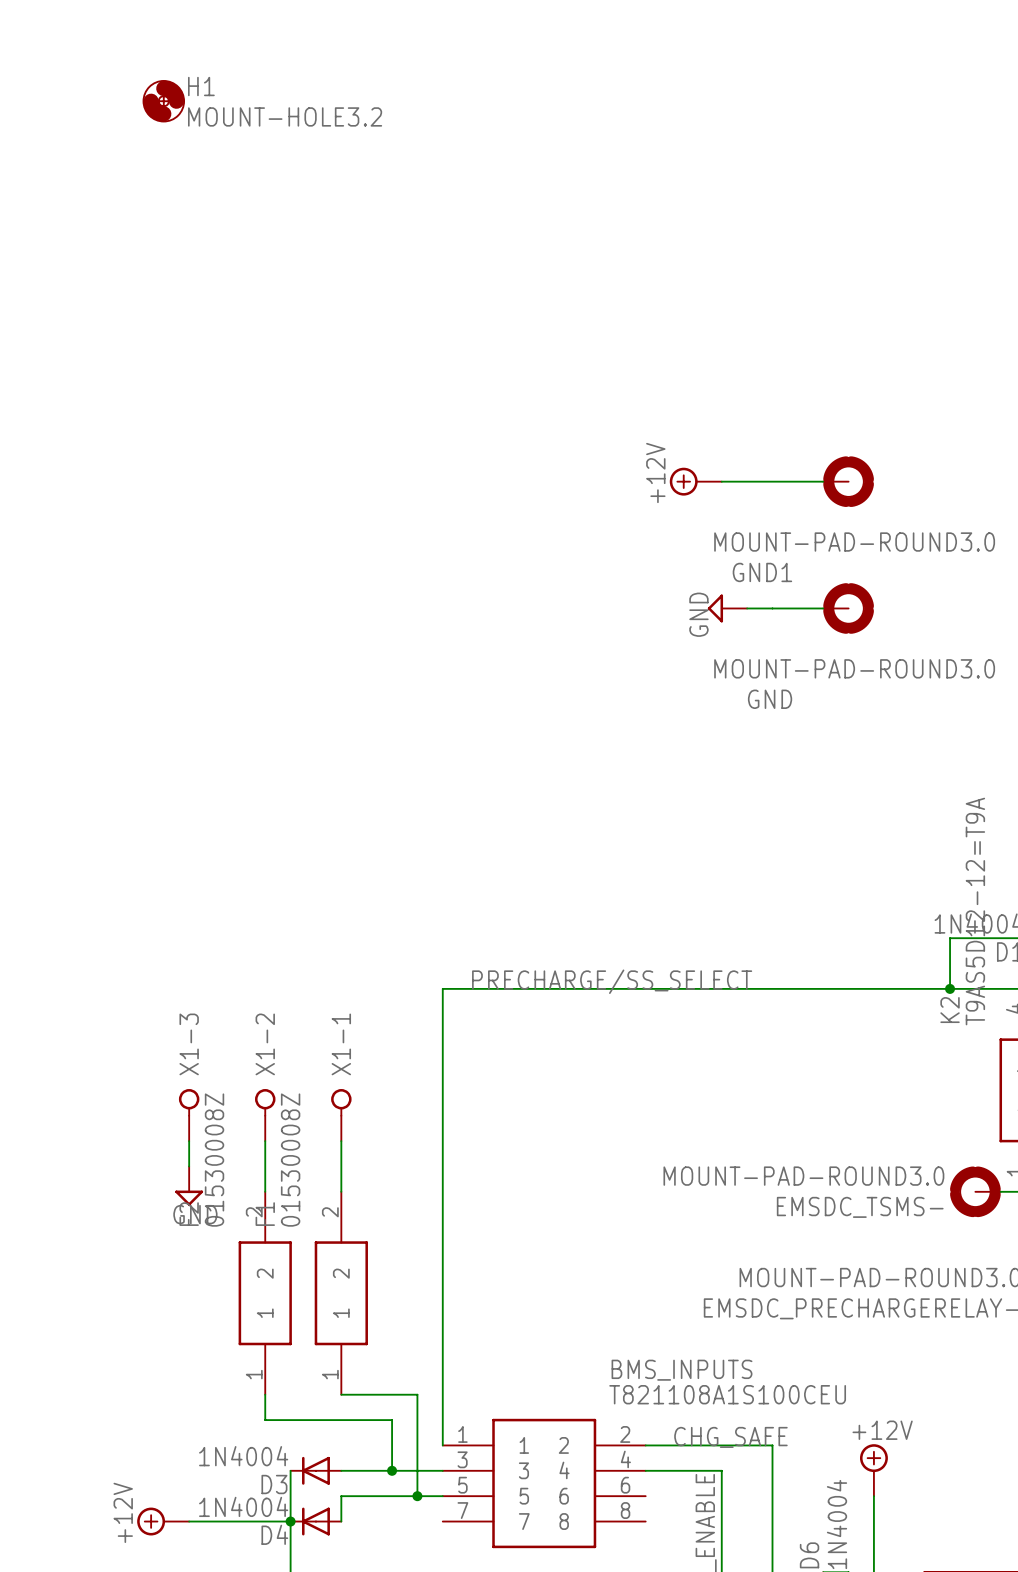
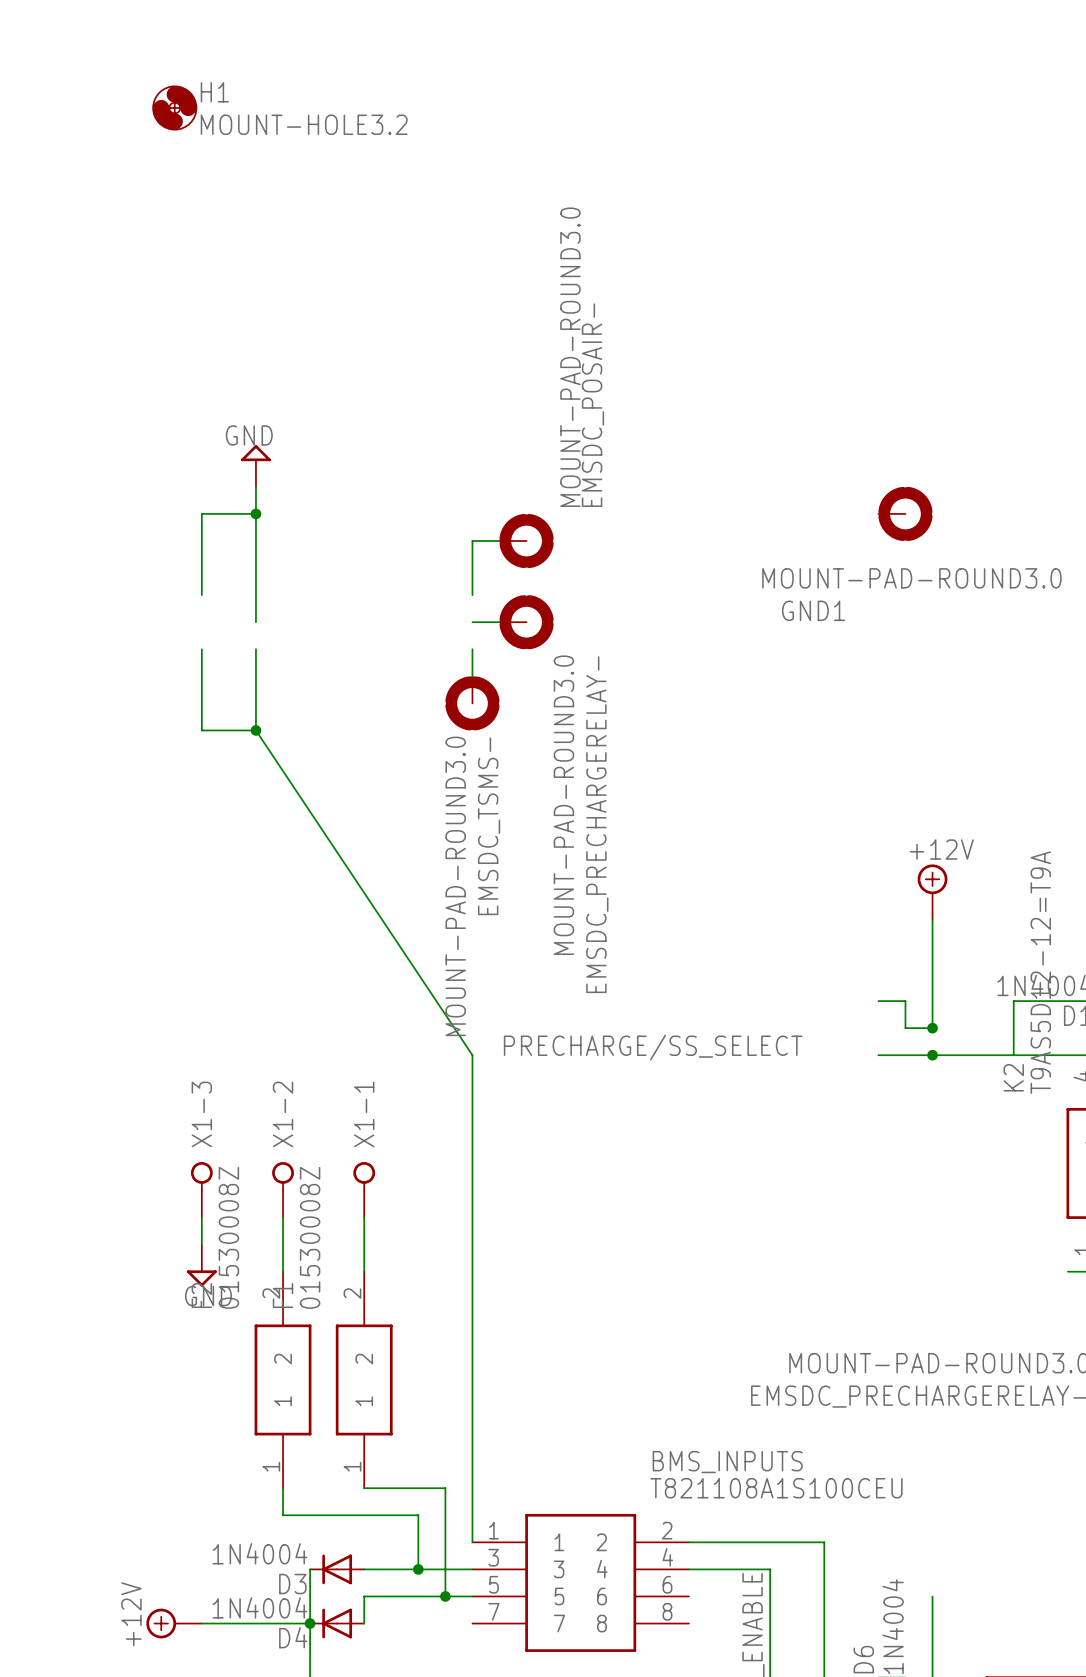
power symbol: none -> GND (255, 465)
wire: none -> (255, 486) (255, 622)
wire: none -> (255, 513) (201, 513) (201, 595)
junction: none -> (255, 513)
power symbol: +12V (695, 481) -> none
wire: (721, 481) (823, 481) -> none
wire: none -> (499, 541) (472, 541) (472, 595)
EMSDC_POSAIR-: none -> MOUNT-PAD-ROUND3.0 (526, 541)
wire: none -> (472, 622) (499, 622)
EMSDC_PRECHARGERELAY-: none -> MOUNT-PAD-ROUND3.0 (526, 622)
wire: none -> (201, 649) (201, 730) (255, 730)
wire: none -> (255, 649) (255, 730)
wire: none -> (472, 649) (472, 676)
power symbol: GND (727, 608) -> none
wire: (747, 608) (823, 608) -> none
GND: MOUNT-PAD-ROUND3.0 (848, 608) -> none
EMSDC_TSMS-: none -> MOUNT-PAD-ROUND3.0 (472, 703)
junction: none -> (255, 730)
power symbol: none -> +12V (932, 892)
wire: none -> (932, 919) (932, 1028) (905, 1028) (905, 1001) (878, 1001)
junction: none -> (932, 1028)
wire: (442, 988) (823, 988) -> (472, 1055) (255, 730)
junction: none -> (932, 1055)
junction: (950, 988) -> none
EMSDC_TSMS-: MOUNT-PAD-ROUND3.0 (975, 1191) -> none
label: CHG_SAFE (730, 1437) -> none
power symbol: +12V (873, 1470) -> none

